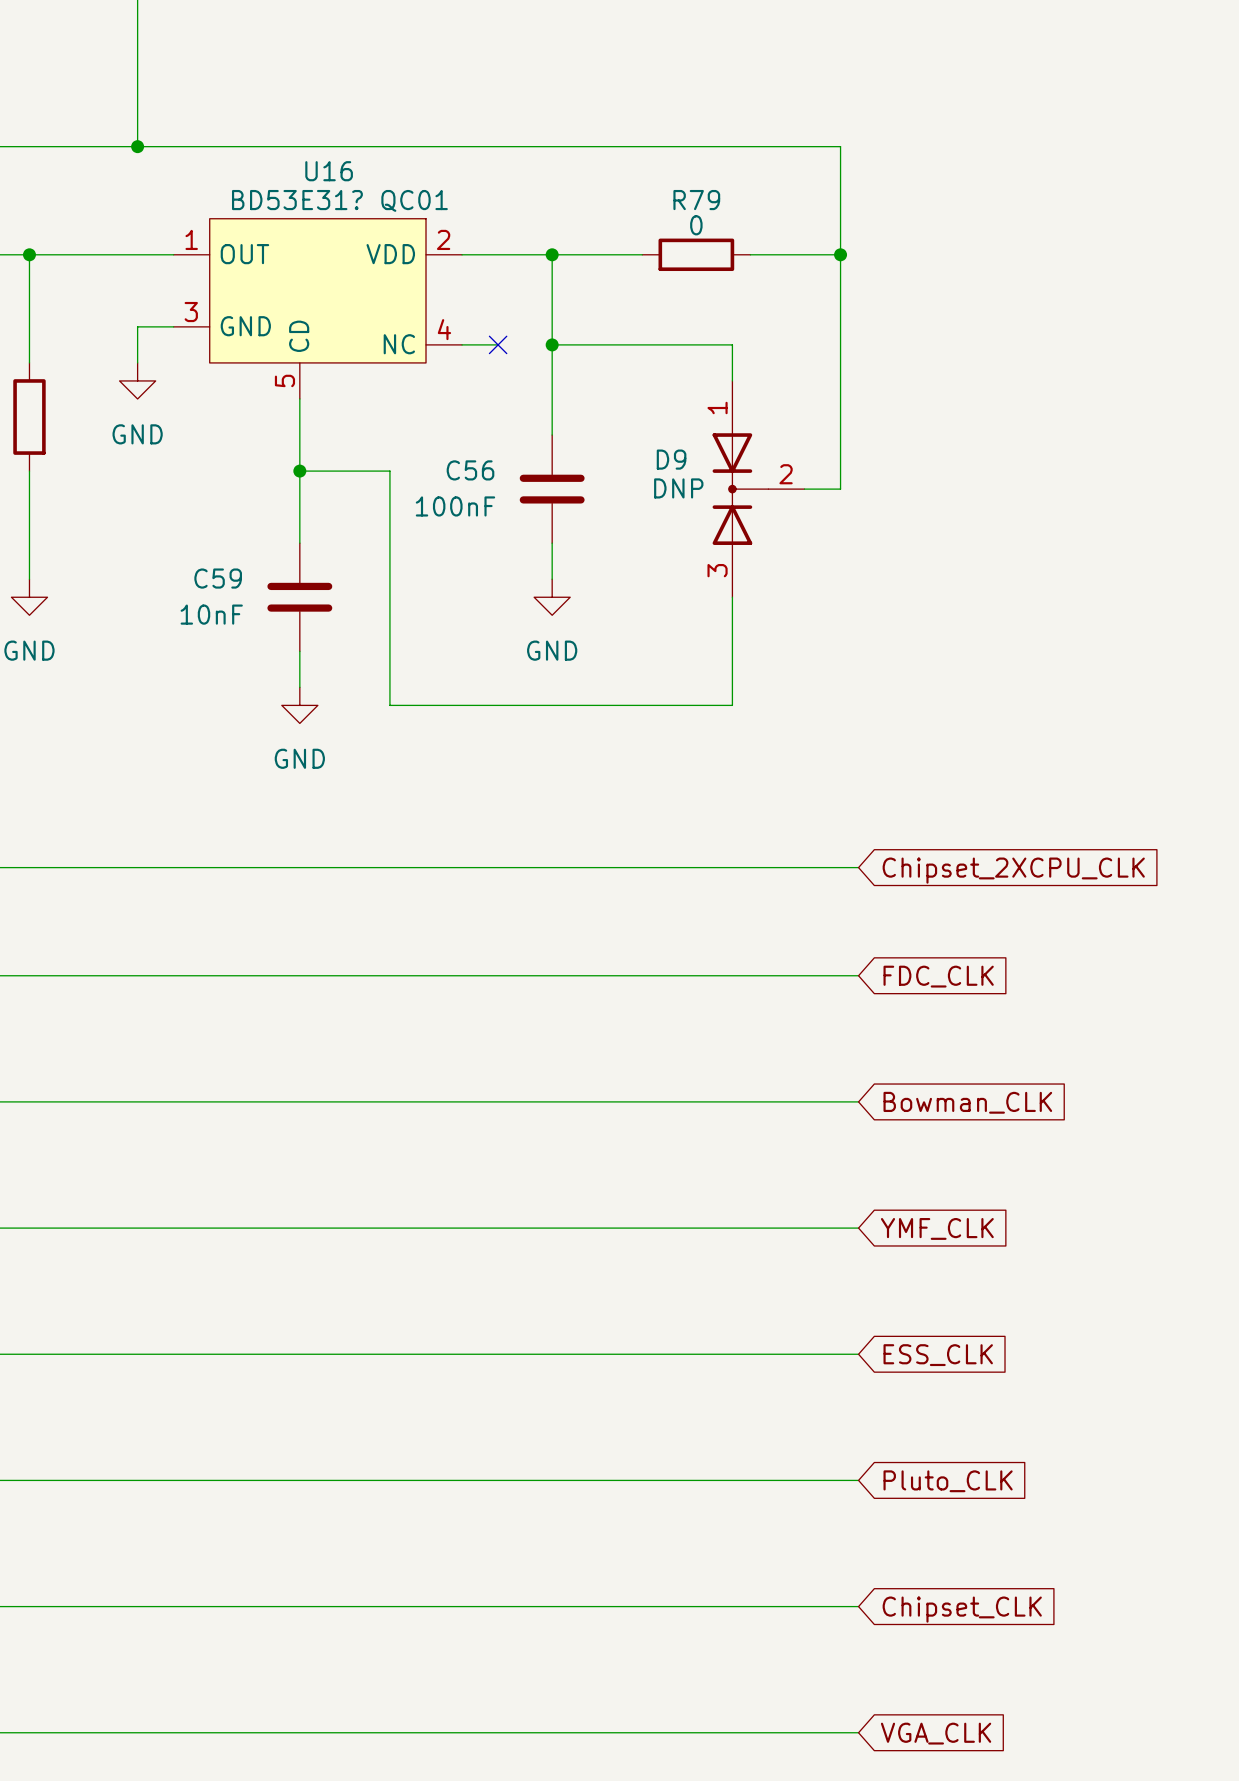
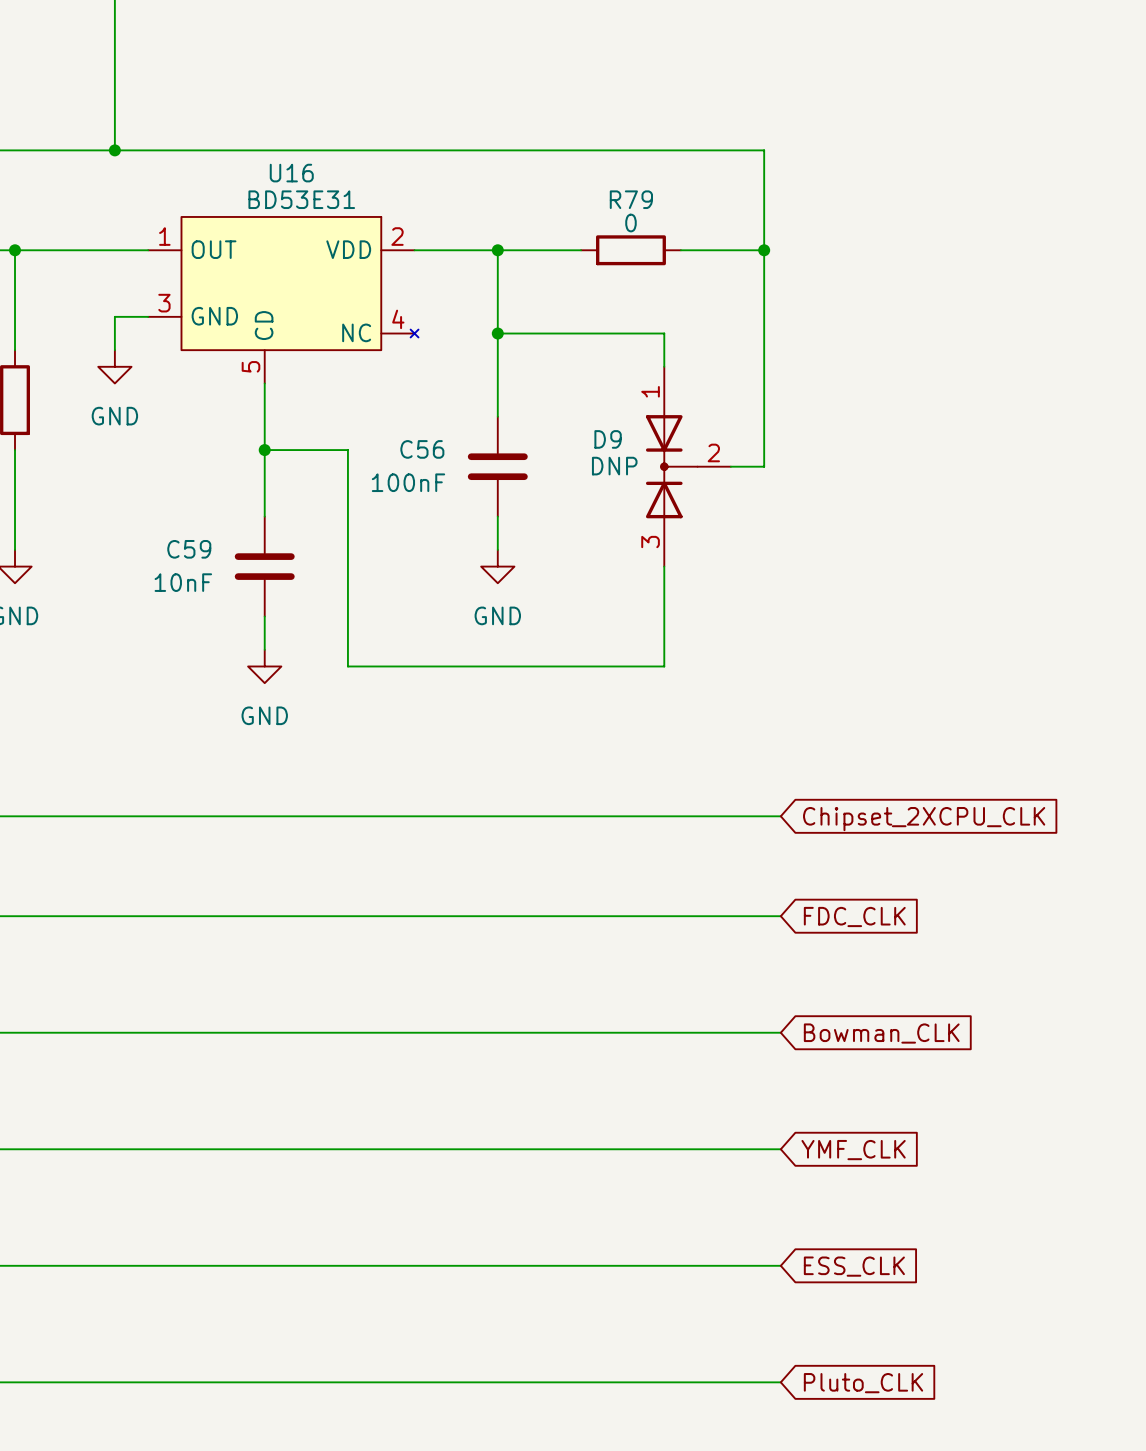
U16 value: BD53E31? QC01 (339, 200) -> BD53E31 (301, 199)
U16 symbol: [173, 218, 463, 399] -> [148, 216, 419, 384]
wire: (462, 344) (498, 344) -> none
no-connect mark: (498, 344) -> none

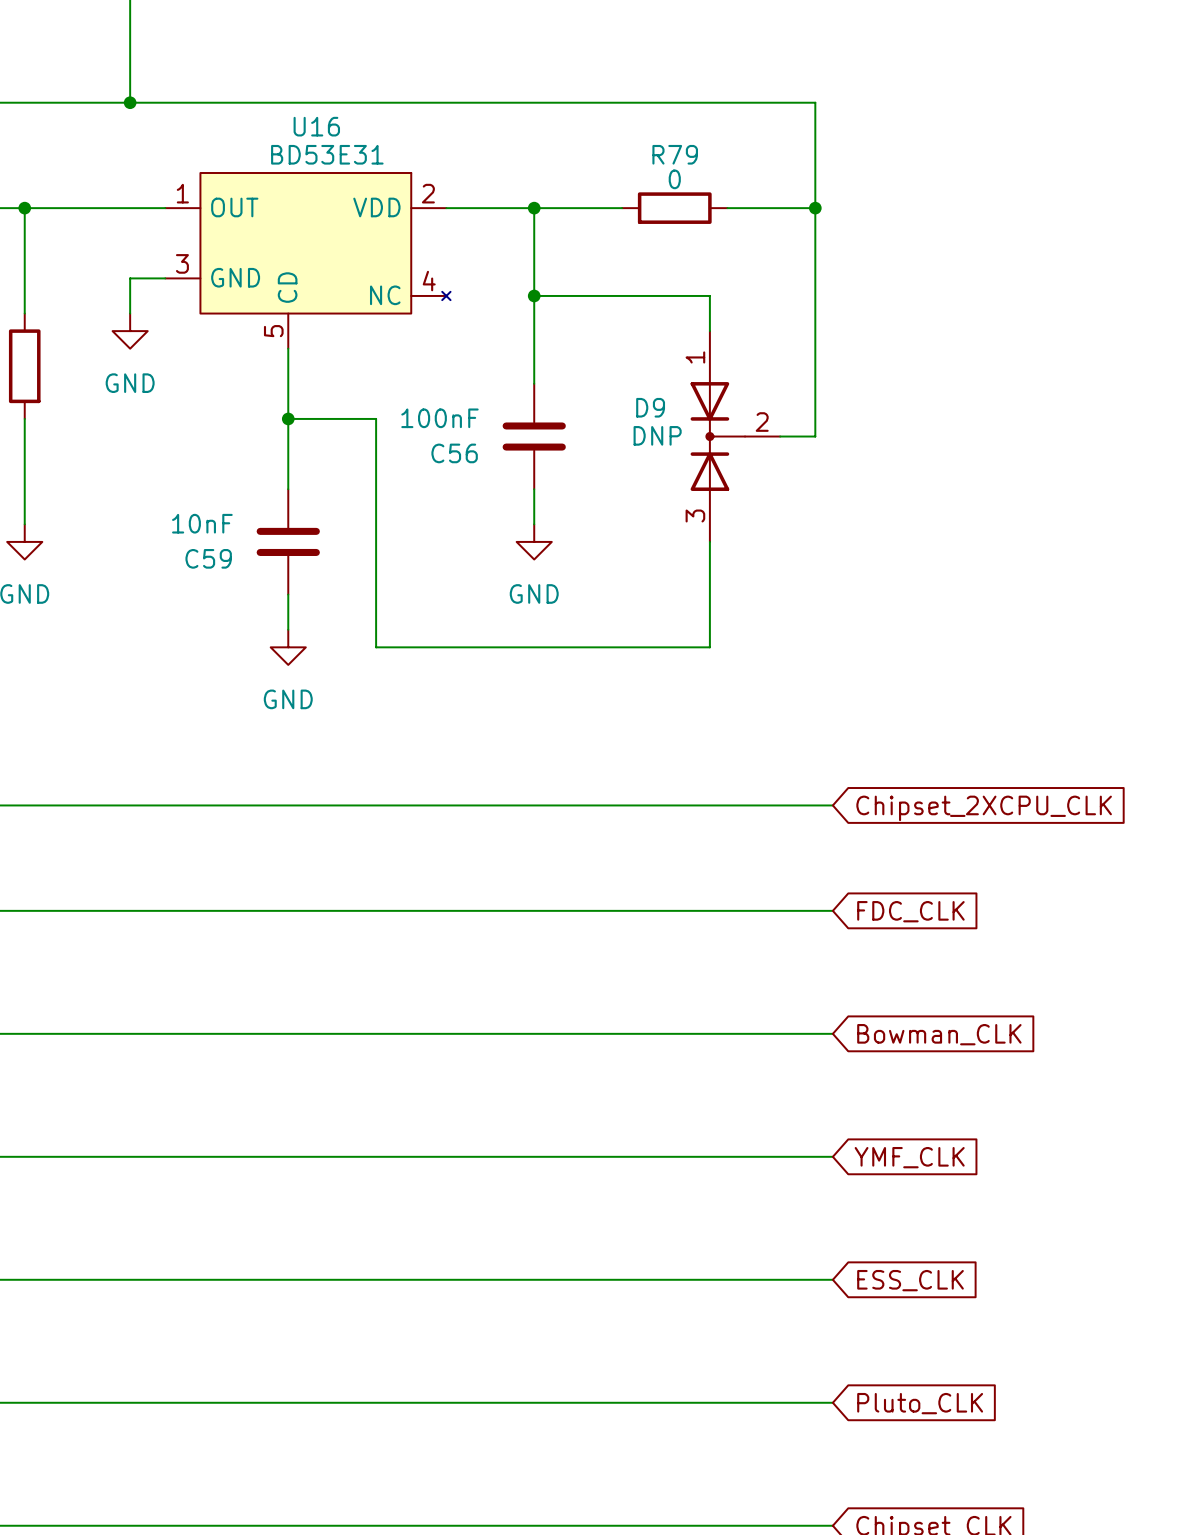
C56 name position: C56 (422, 449) -> C56 (454, 453)
C56 value position: 100nF (408, 482) -> 100nF (439, 418)
C59 name position: C59 (189, 549) -> C59 (208, 558)
C59 value position: 10nF (183, 582) -> 10nF (202, 523)

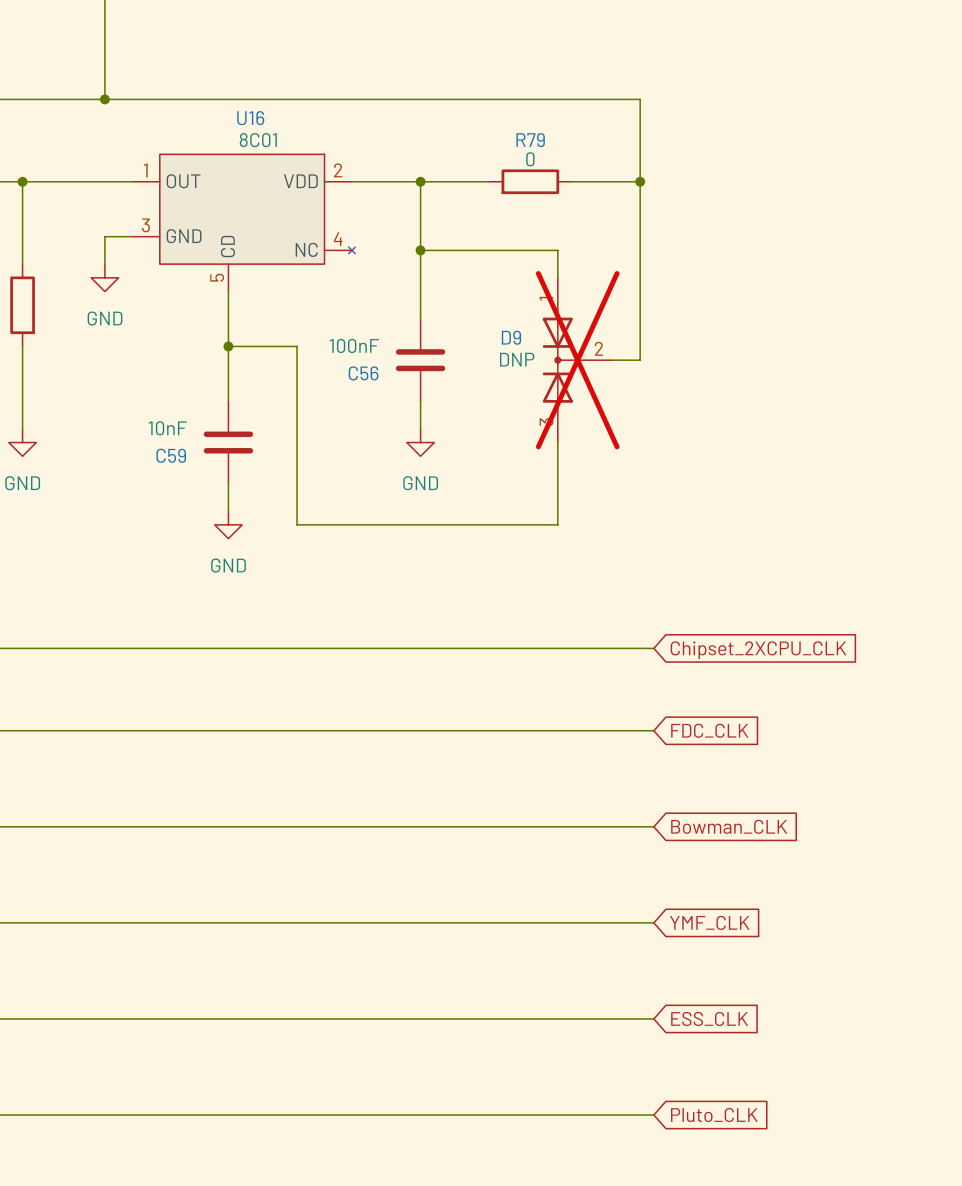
U16 value: BD53E31 (327, 154) -> 8C01 (258, 140)
D9 do-not-place cross: none -> (577, 360)

